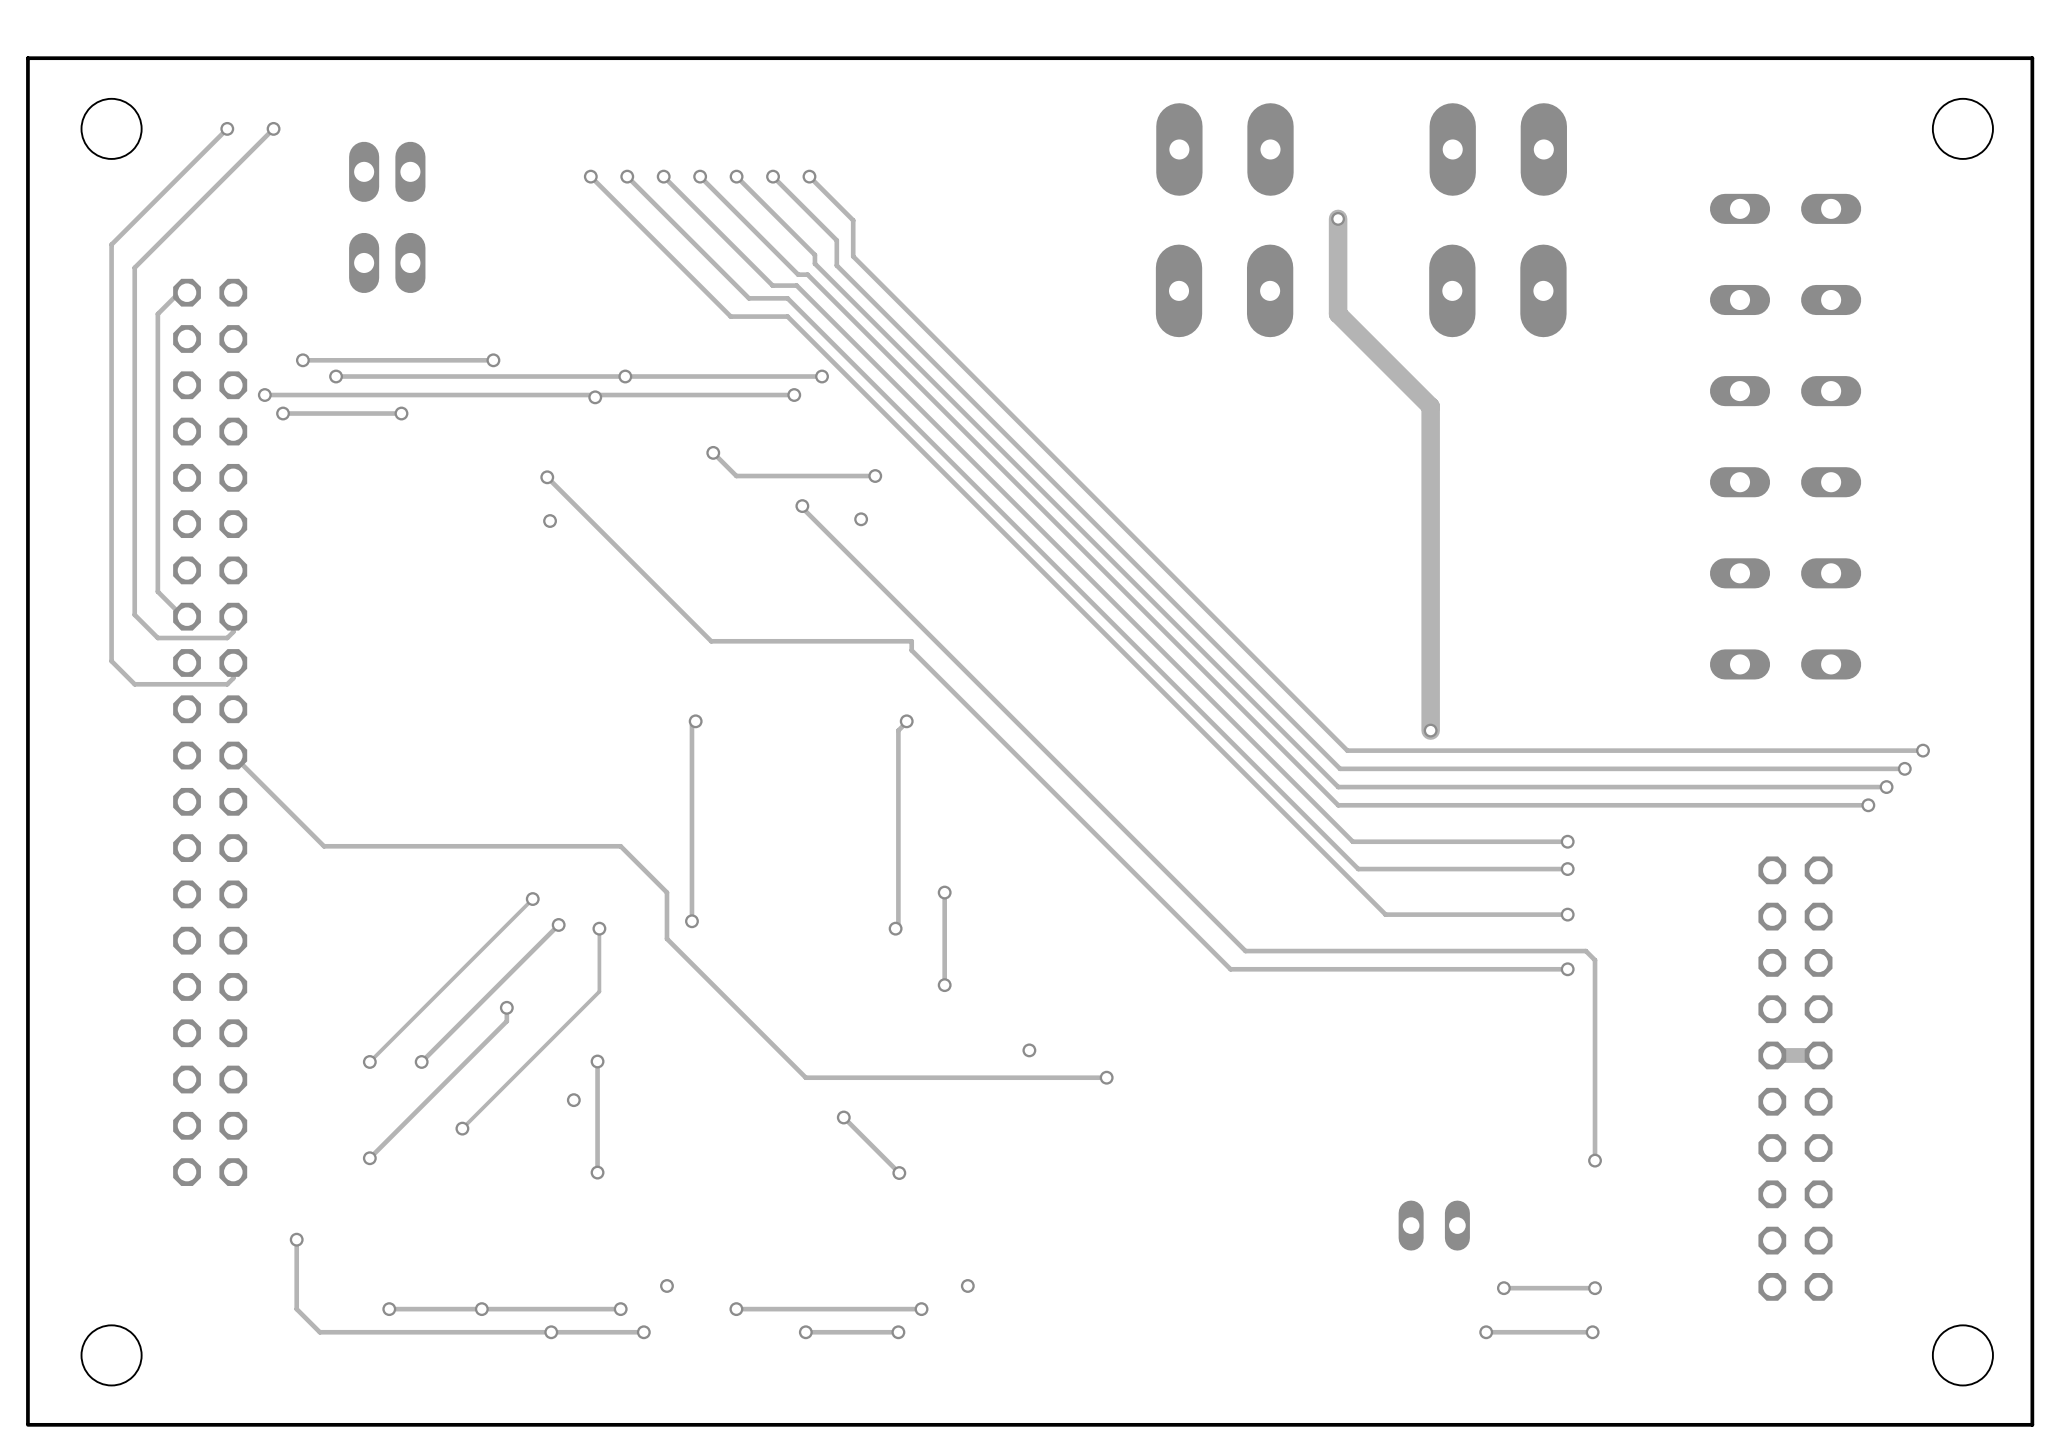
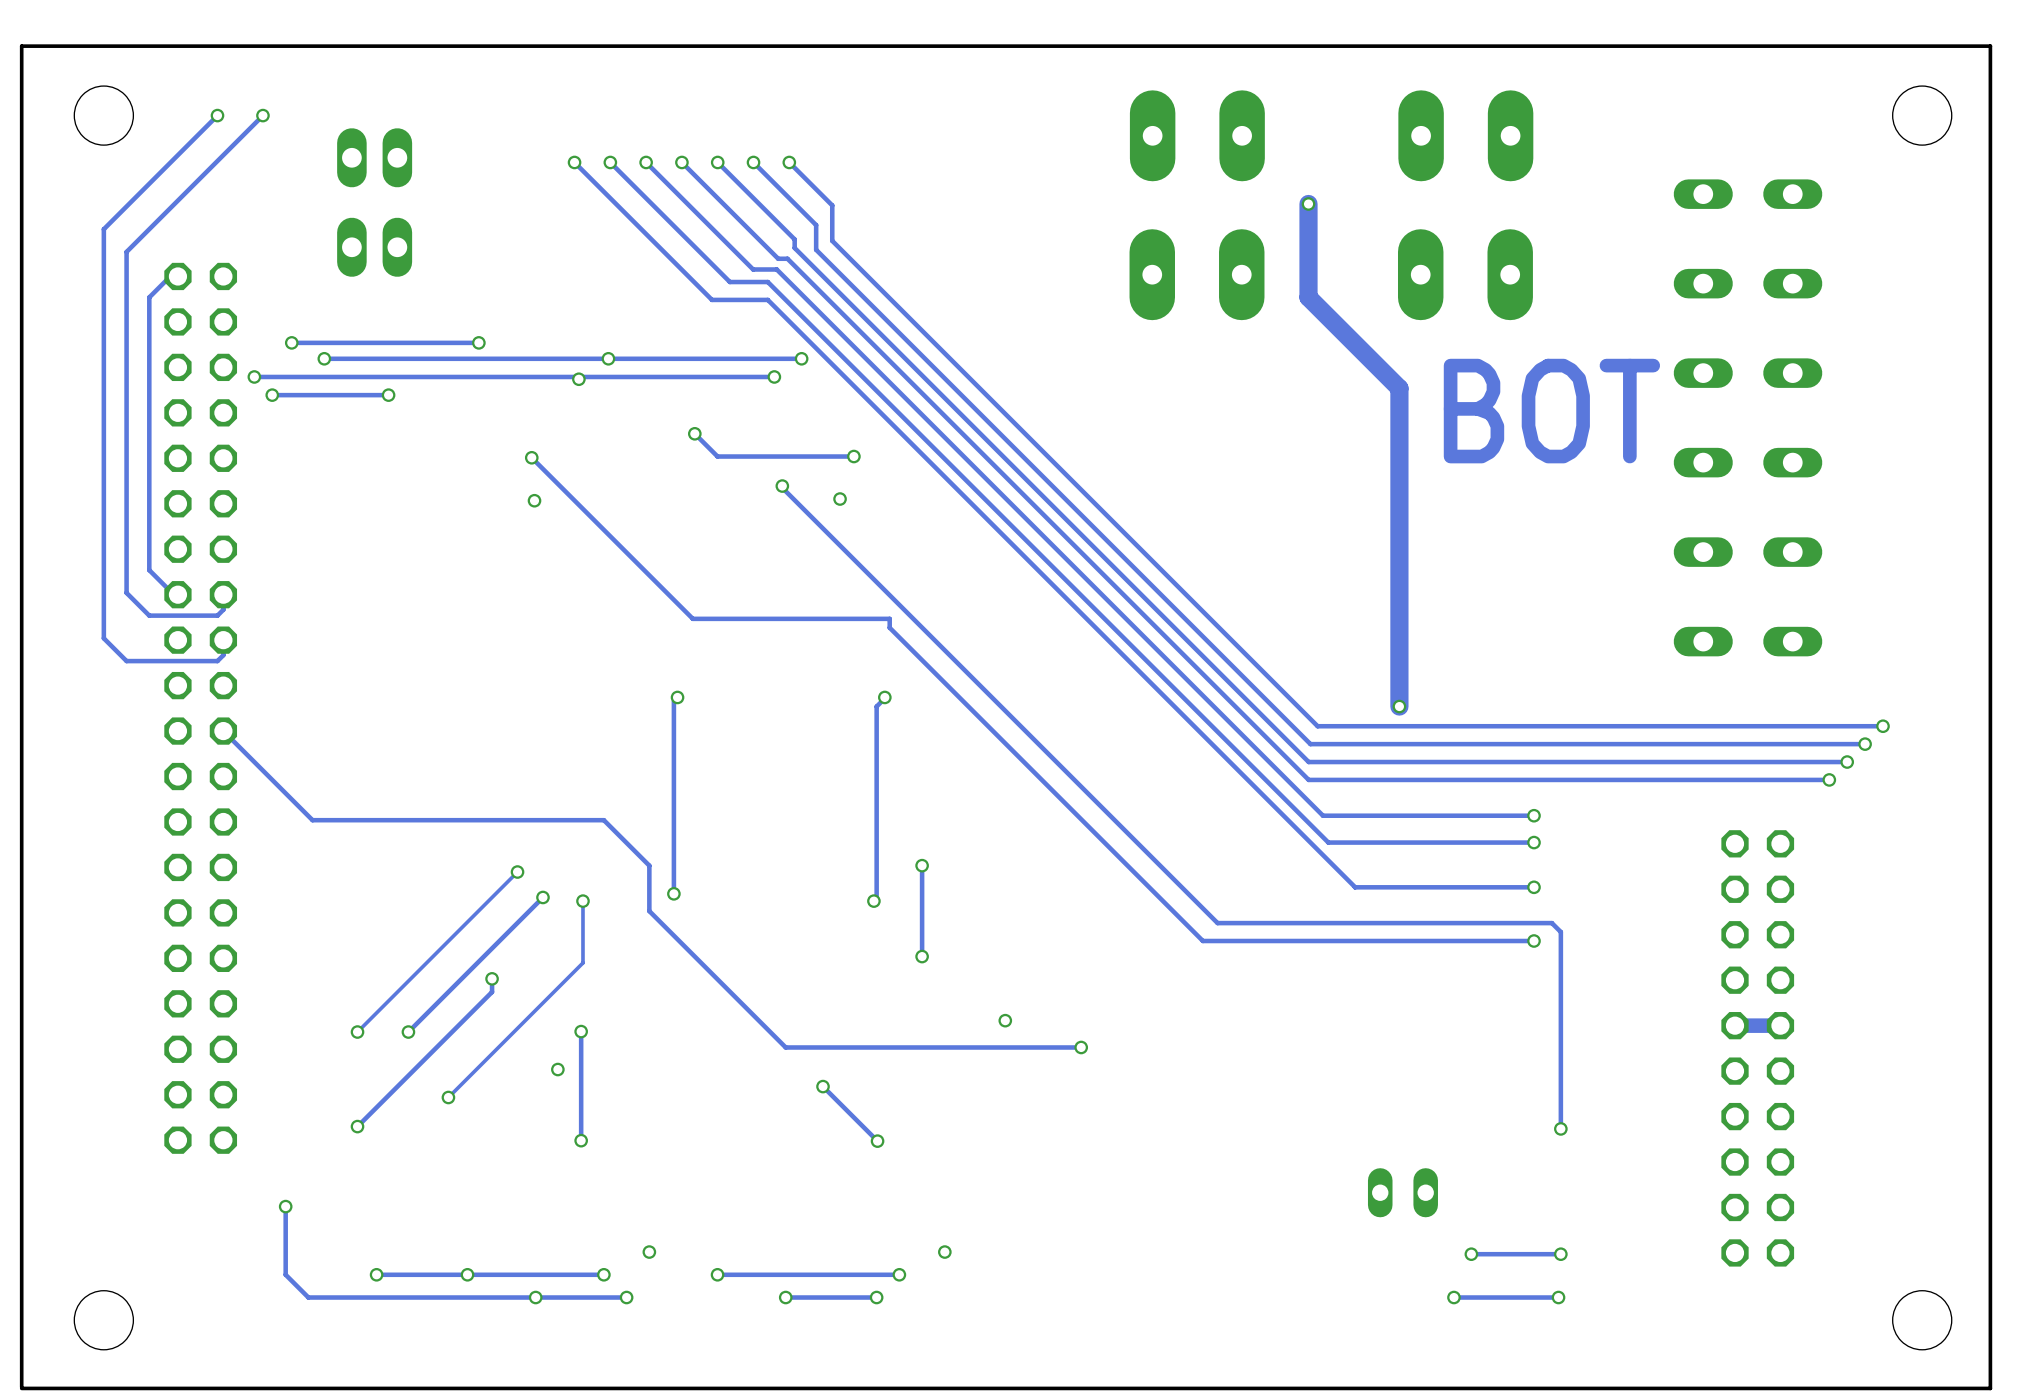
text: none -> BOT (1551, 411)

